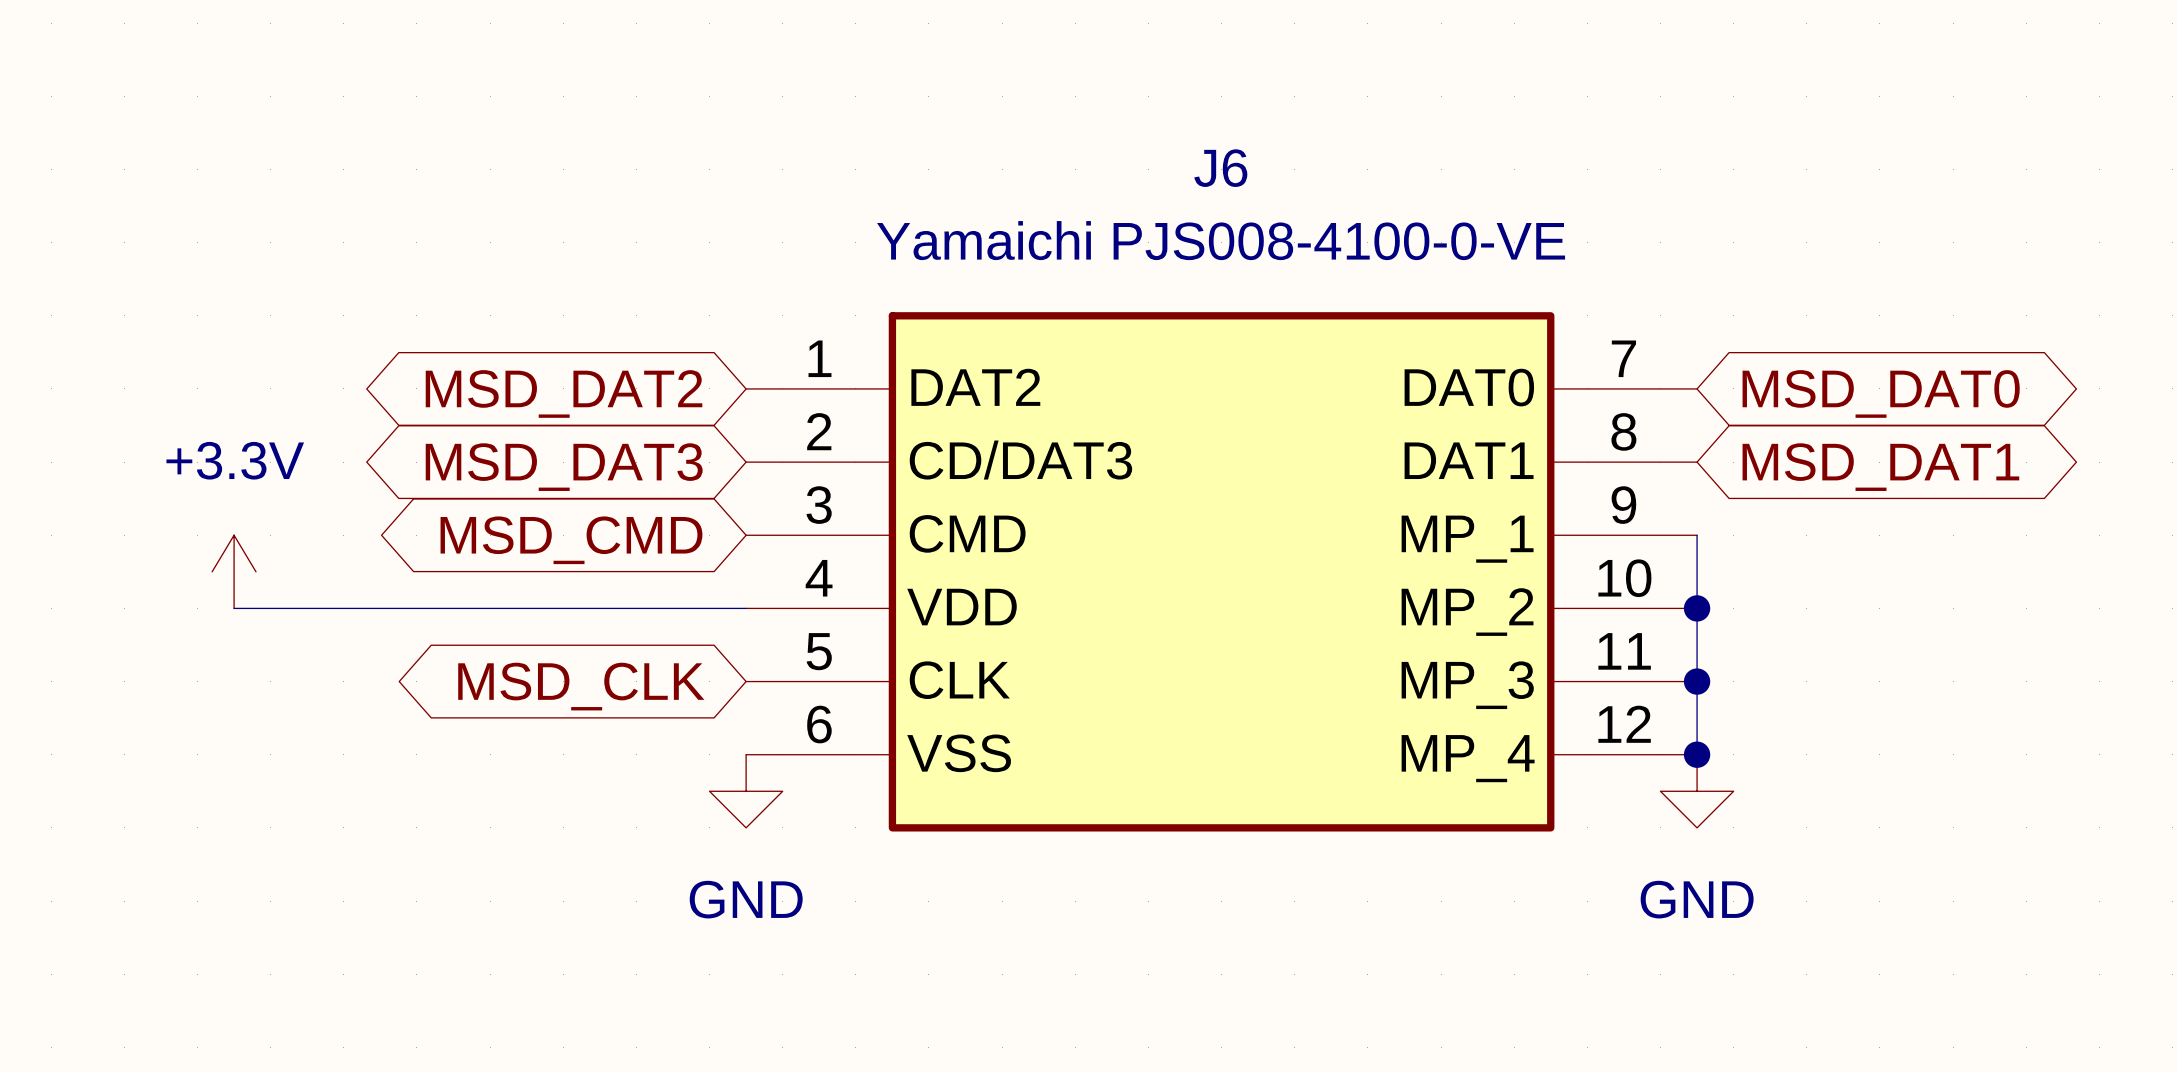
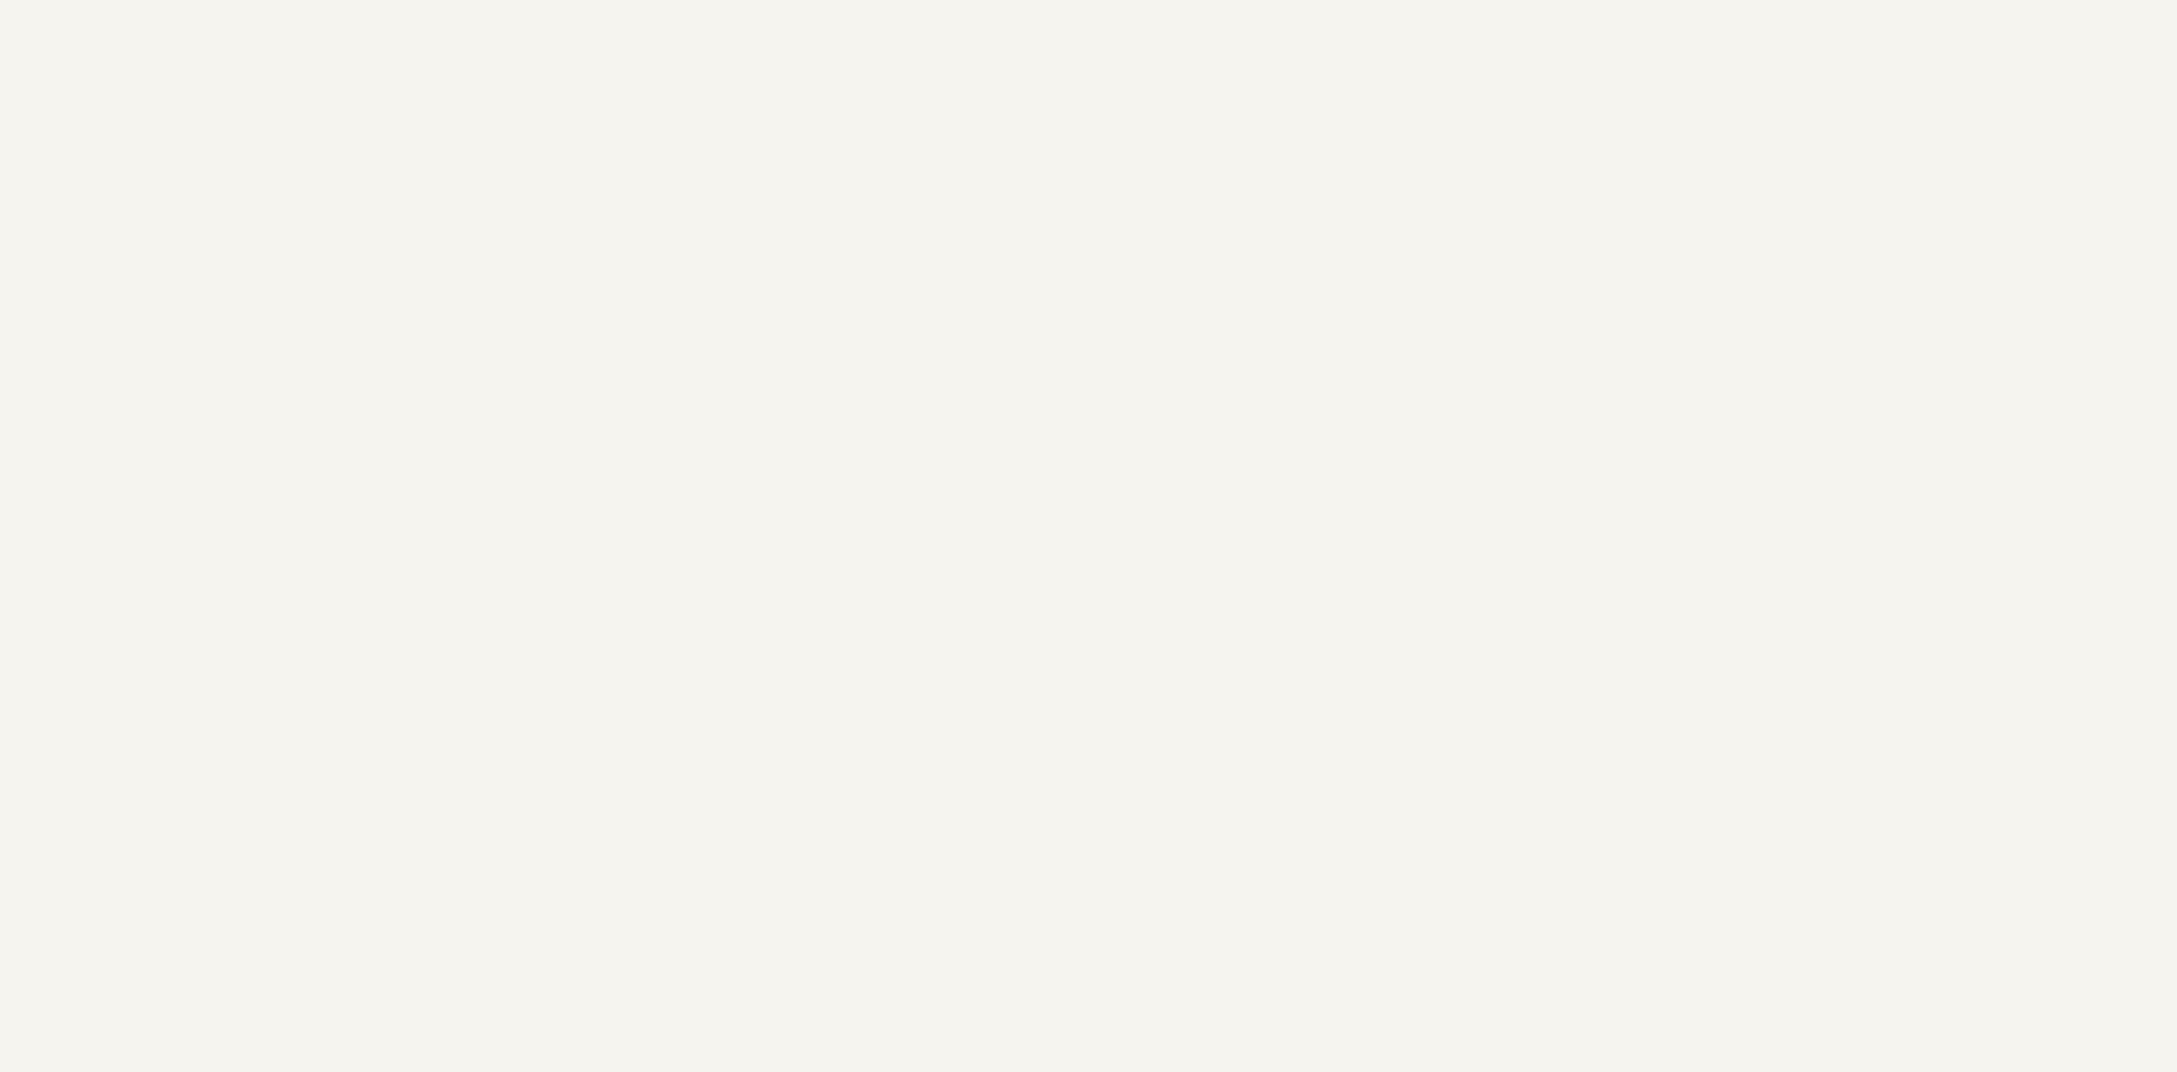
global label: MSD_DAT2 (564, 393) -> none
global label: MSD_DAT0 (1881, 393) -> none
global label: MSD_DAT3 (564, 467) -> none
global label: MSD_DAT1 (1880, 467) -> none
wire: (1697, 535) (1697, 754) -> none
global label: MSD_CMD (571, 540) -> none
power symbol: +3.3V (234, 571) -> none
J6: Yamaichi PJS008-4100-0-VE (1221, 571) -> none
wire: (234, 608) (746, 608) -> none
junction: (1697, 608) -> none
junction: (1697, 681) -> none
global label: MSD_CLK (581, 686) -> none
junction: (1697, 754) -> none
power symbol: GND (746, 791) -> none
power symbol: GND (1697, 791) -> none

